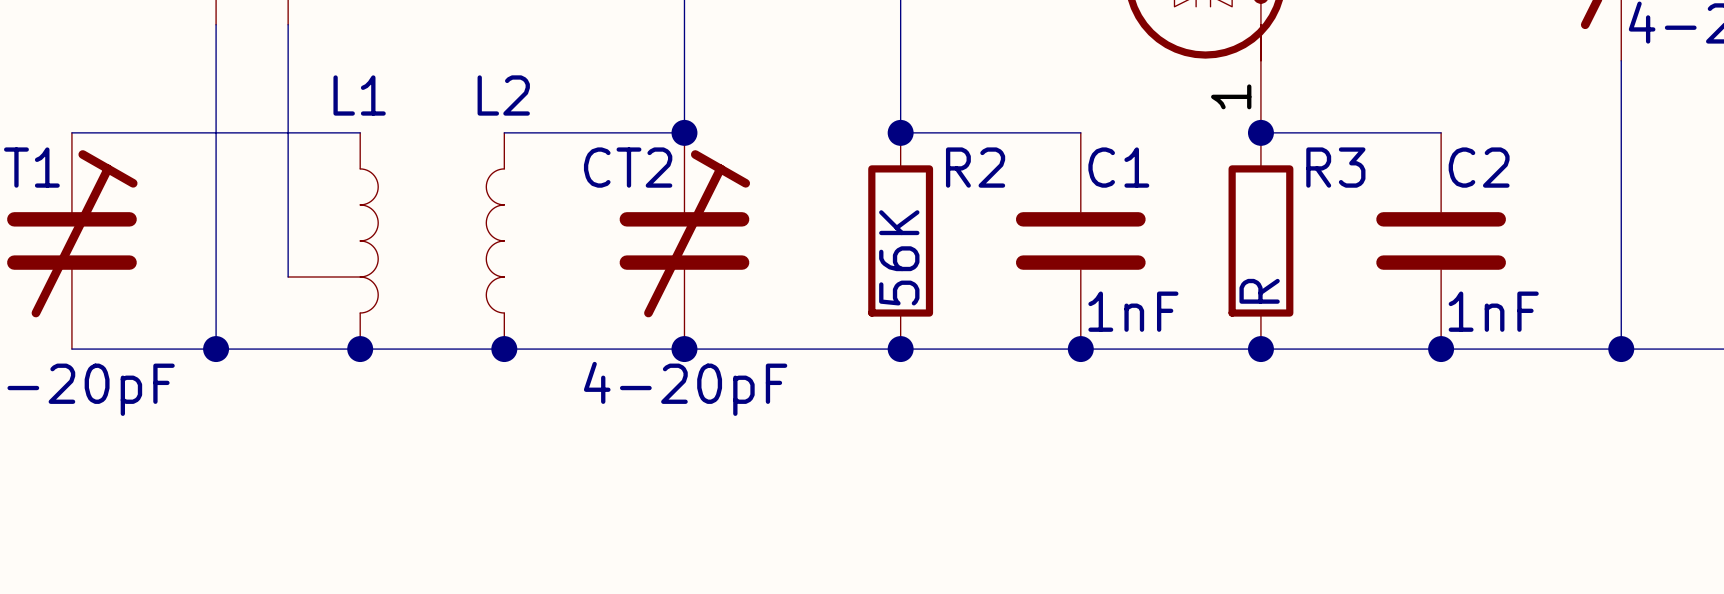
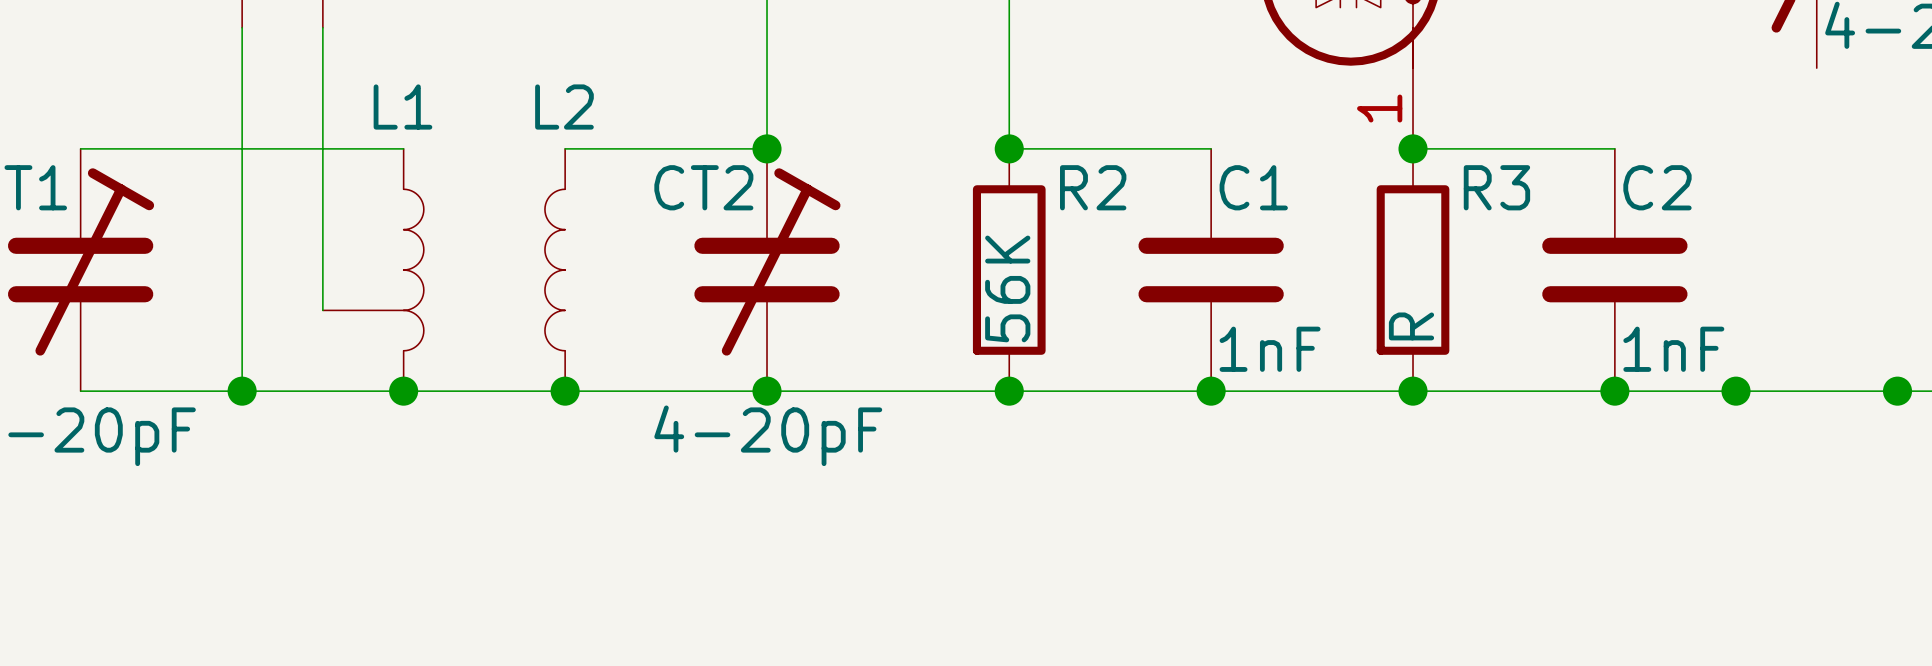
wire: (1621, 60) (1621, 349) -> none
junction: none -> (1736, 391)
junction: (1621, 349) -> none
junction: none -> (1897, 391)

